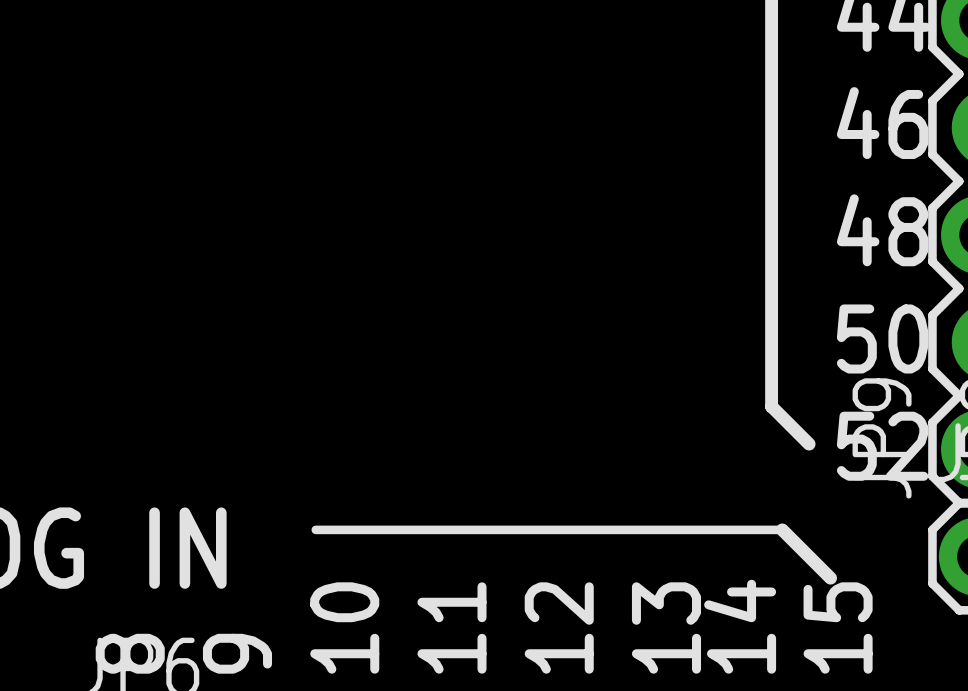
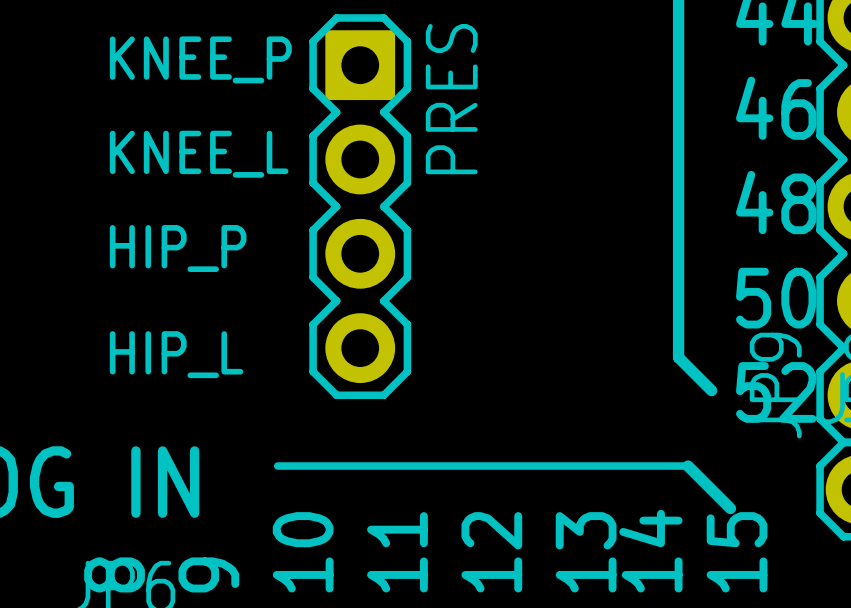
text: none -> KNEE_P (200, 59)
text: none -> KNEE_L (199, 154)
PRES: none -> (360, 206)
text: none -> HIP_P (178, 248)
text: none -> HIP_L (176, 354)

